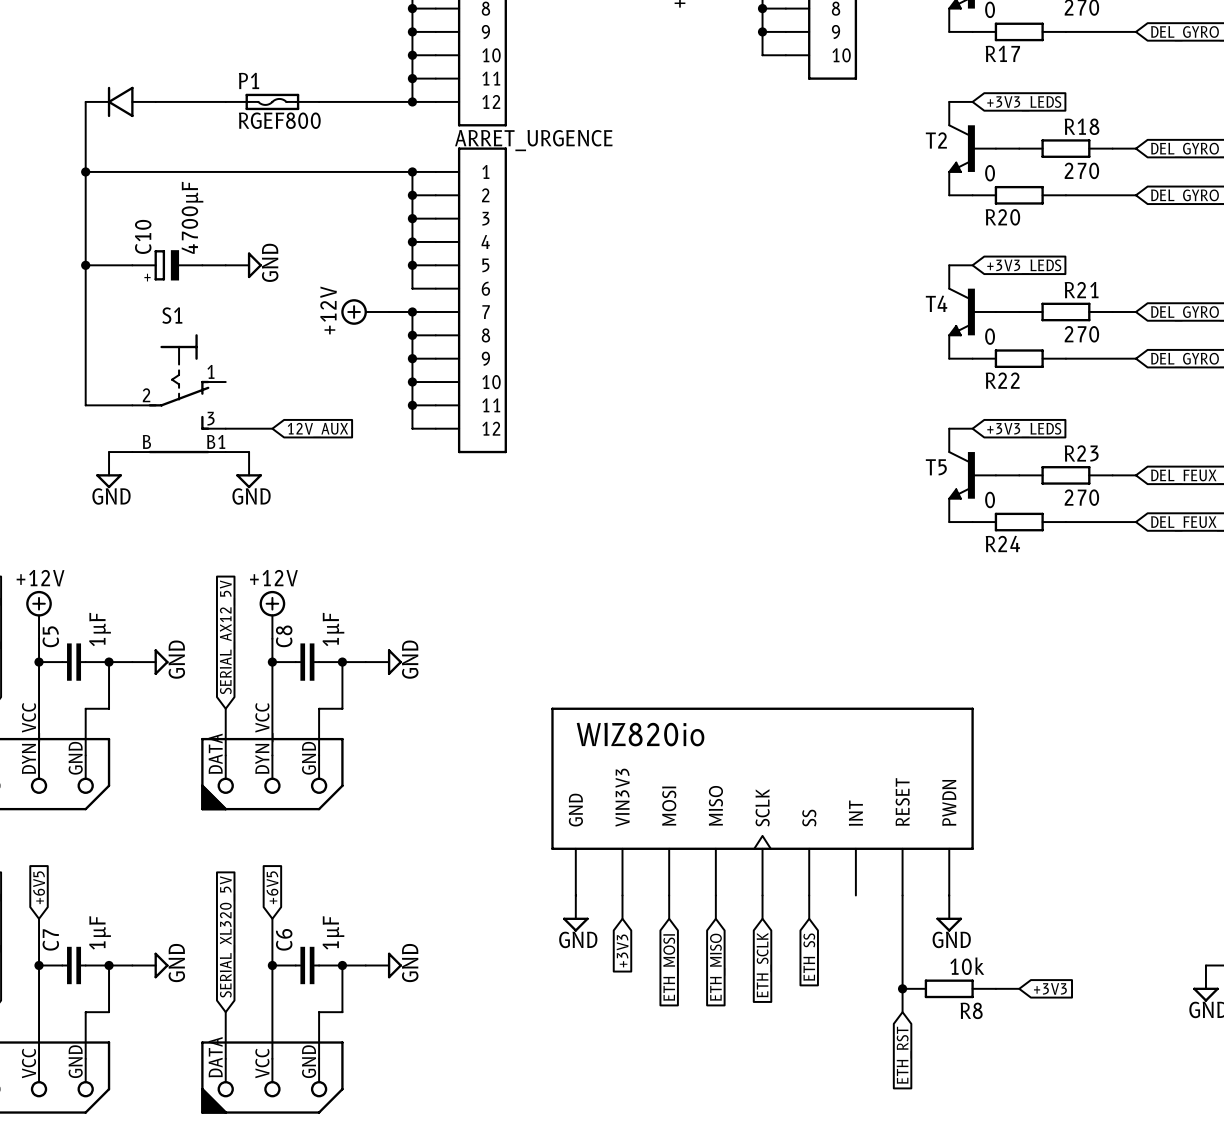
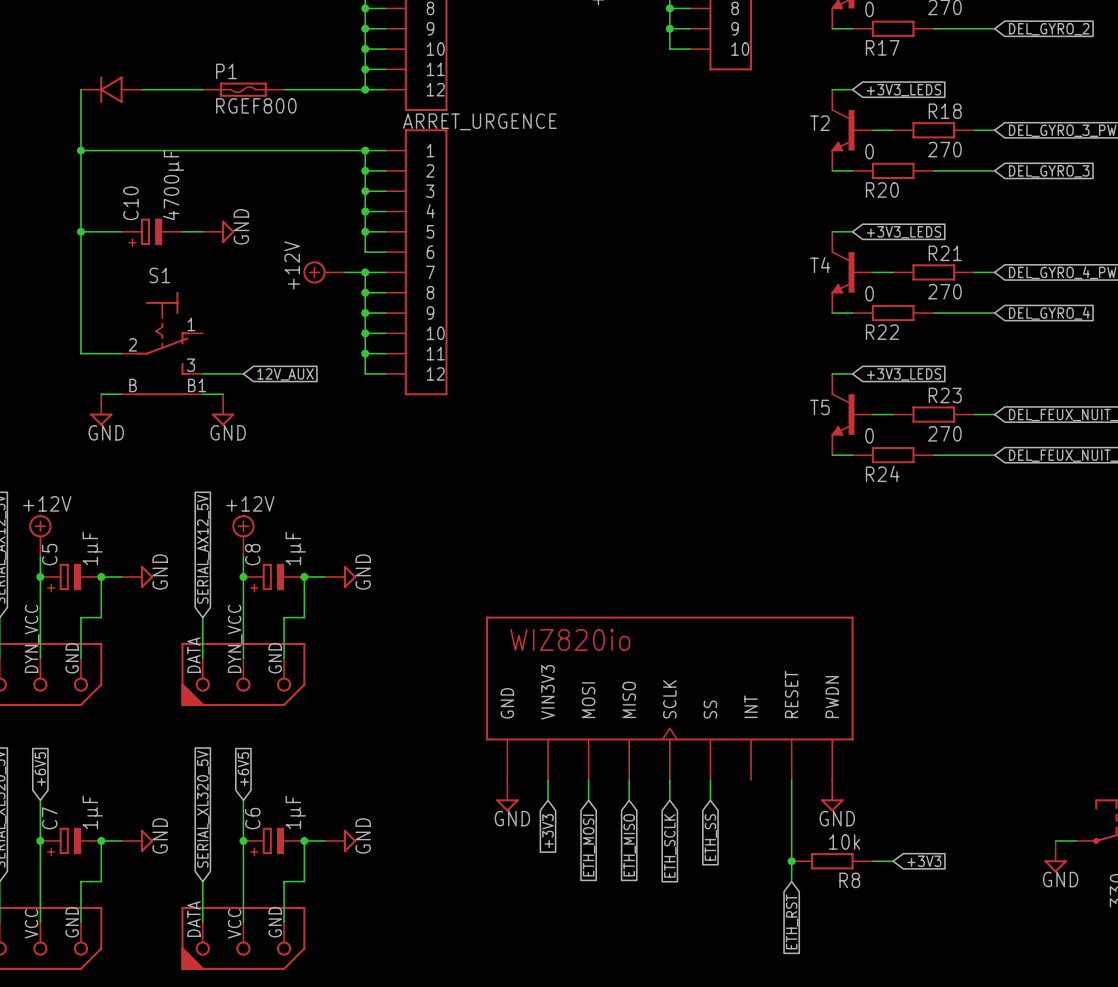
C5 symbol: [39, 643, 110, 681] -> [40, 563, 102, 591]
C8 symbol: [272, 643, 343, 681] -> [243, 563, 305, 591]
C7 symbol: [39, 946, 110, 985] -> [40, 827, 102, 855]
C6 symbol: [272, 946, 343, 985] -> [243, 827, 305, 855]

